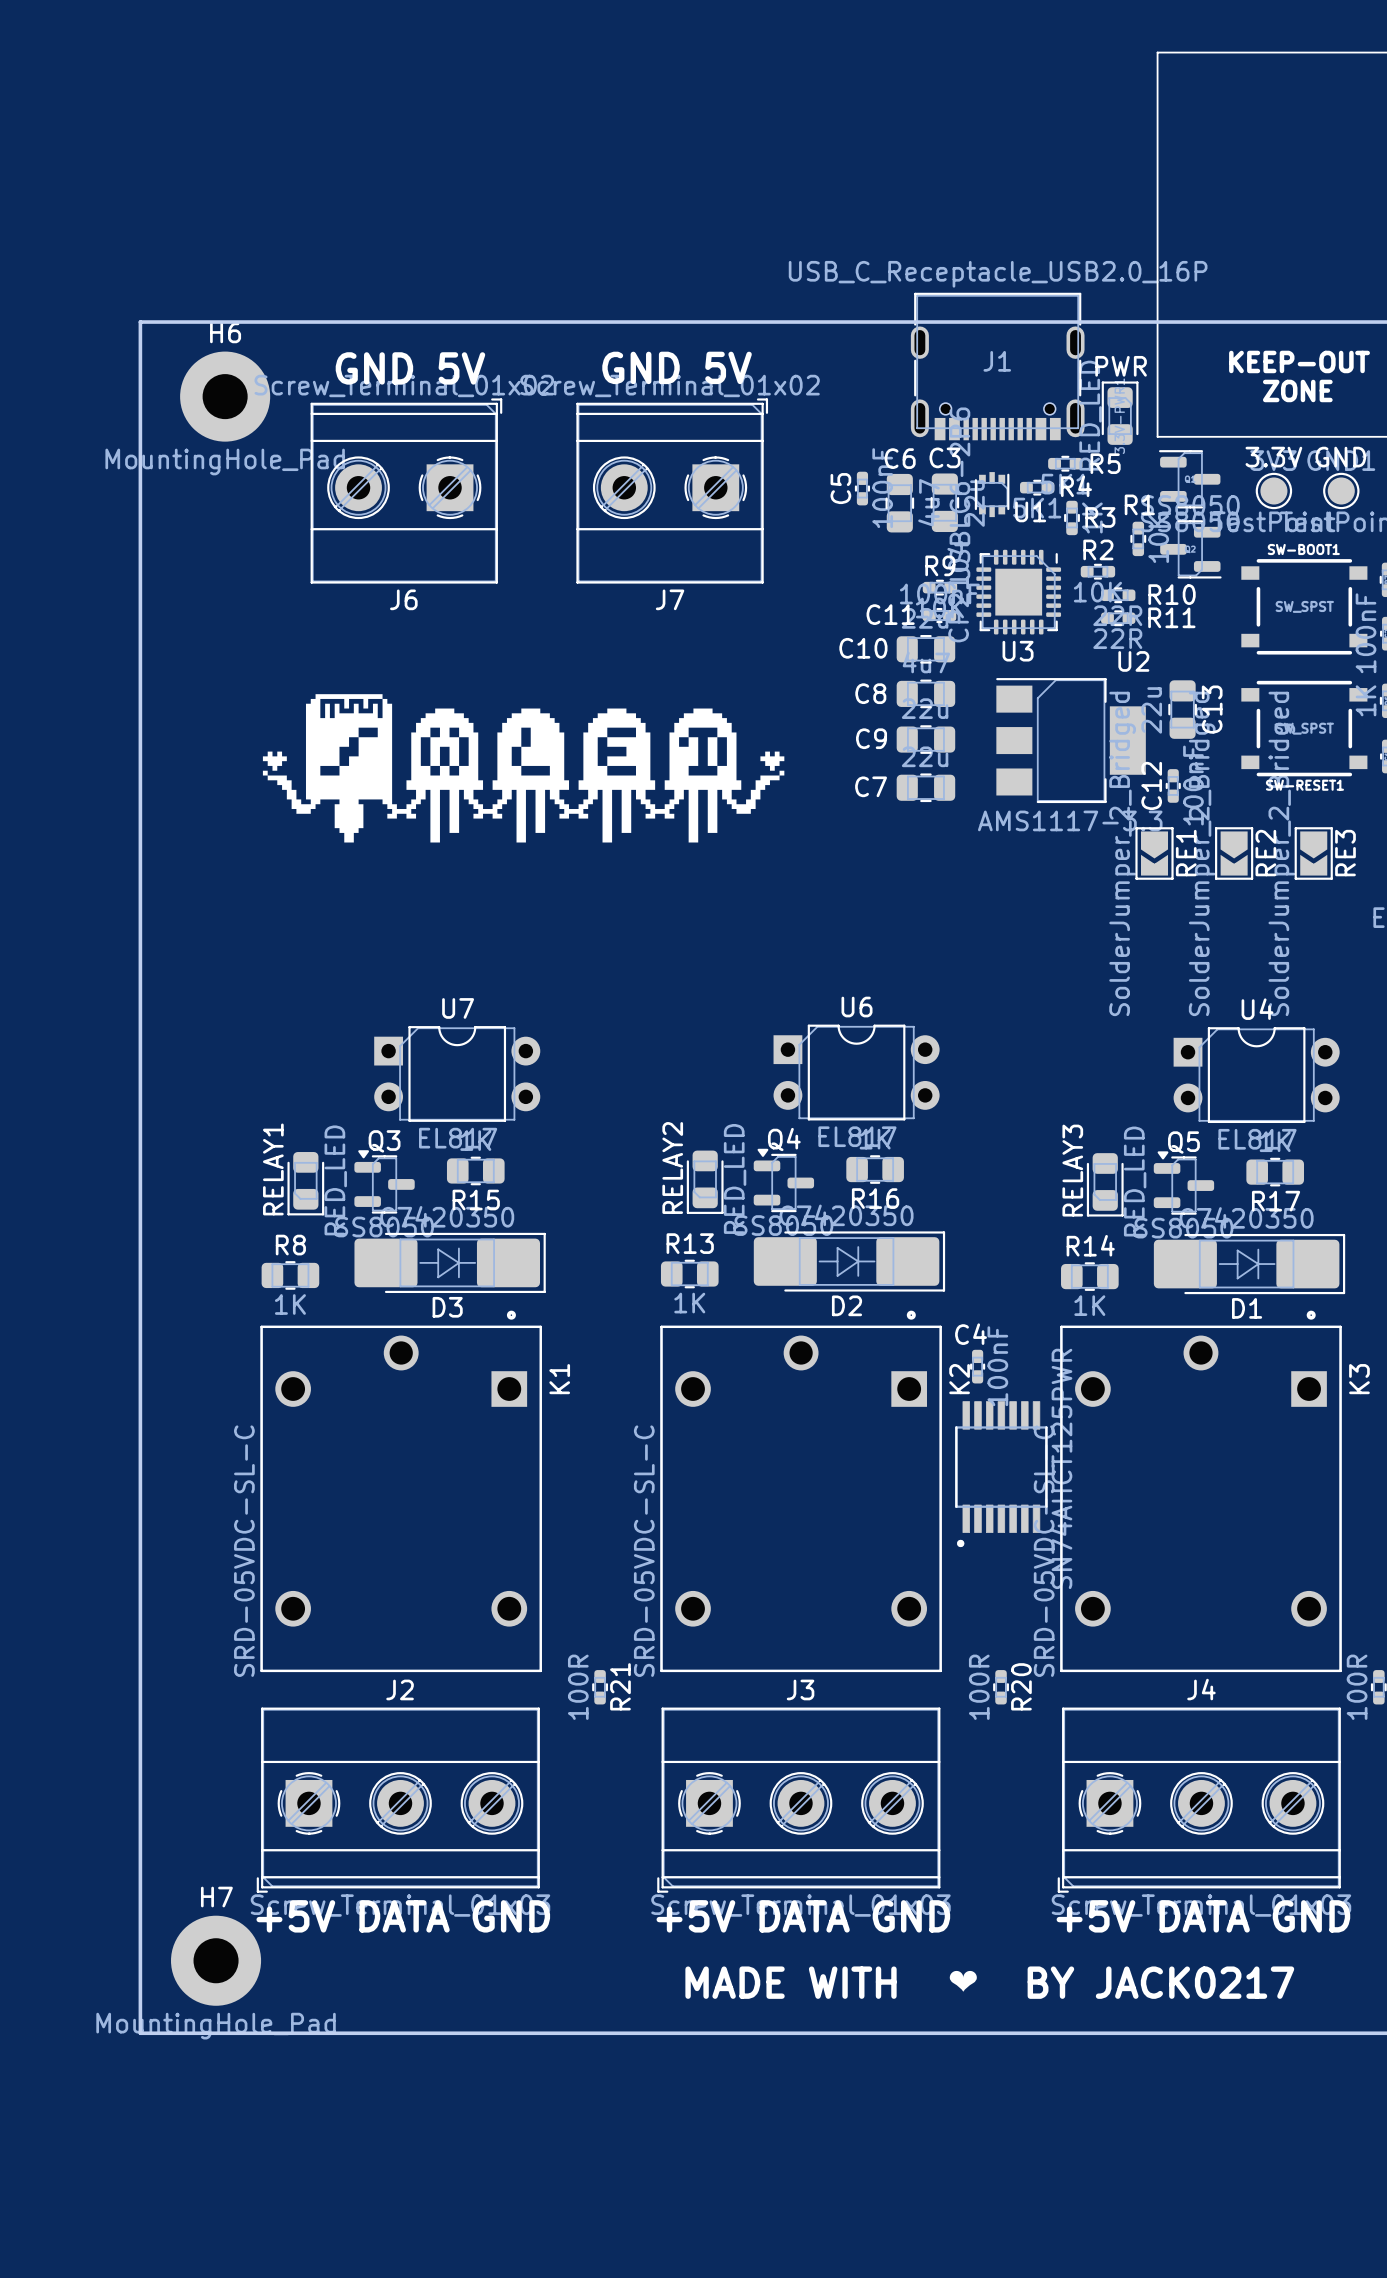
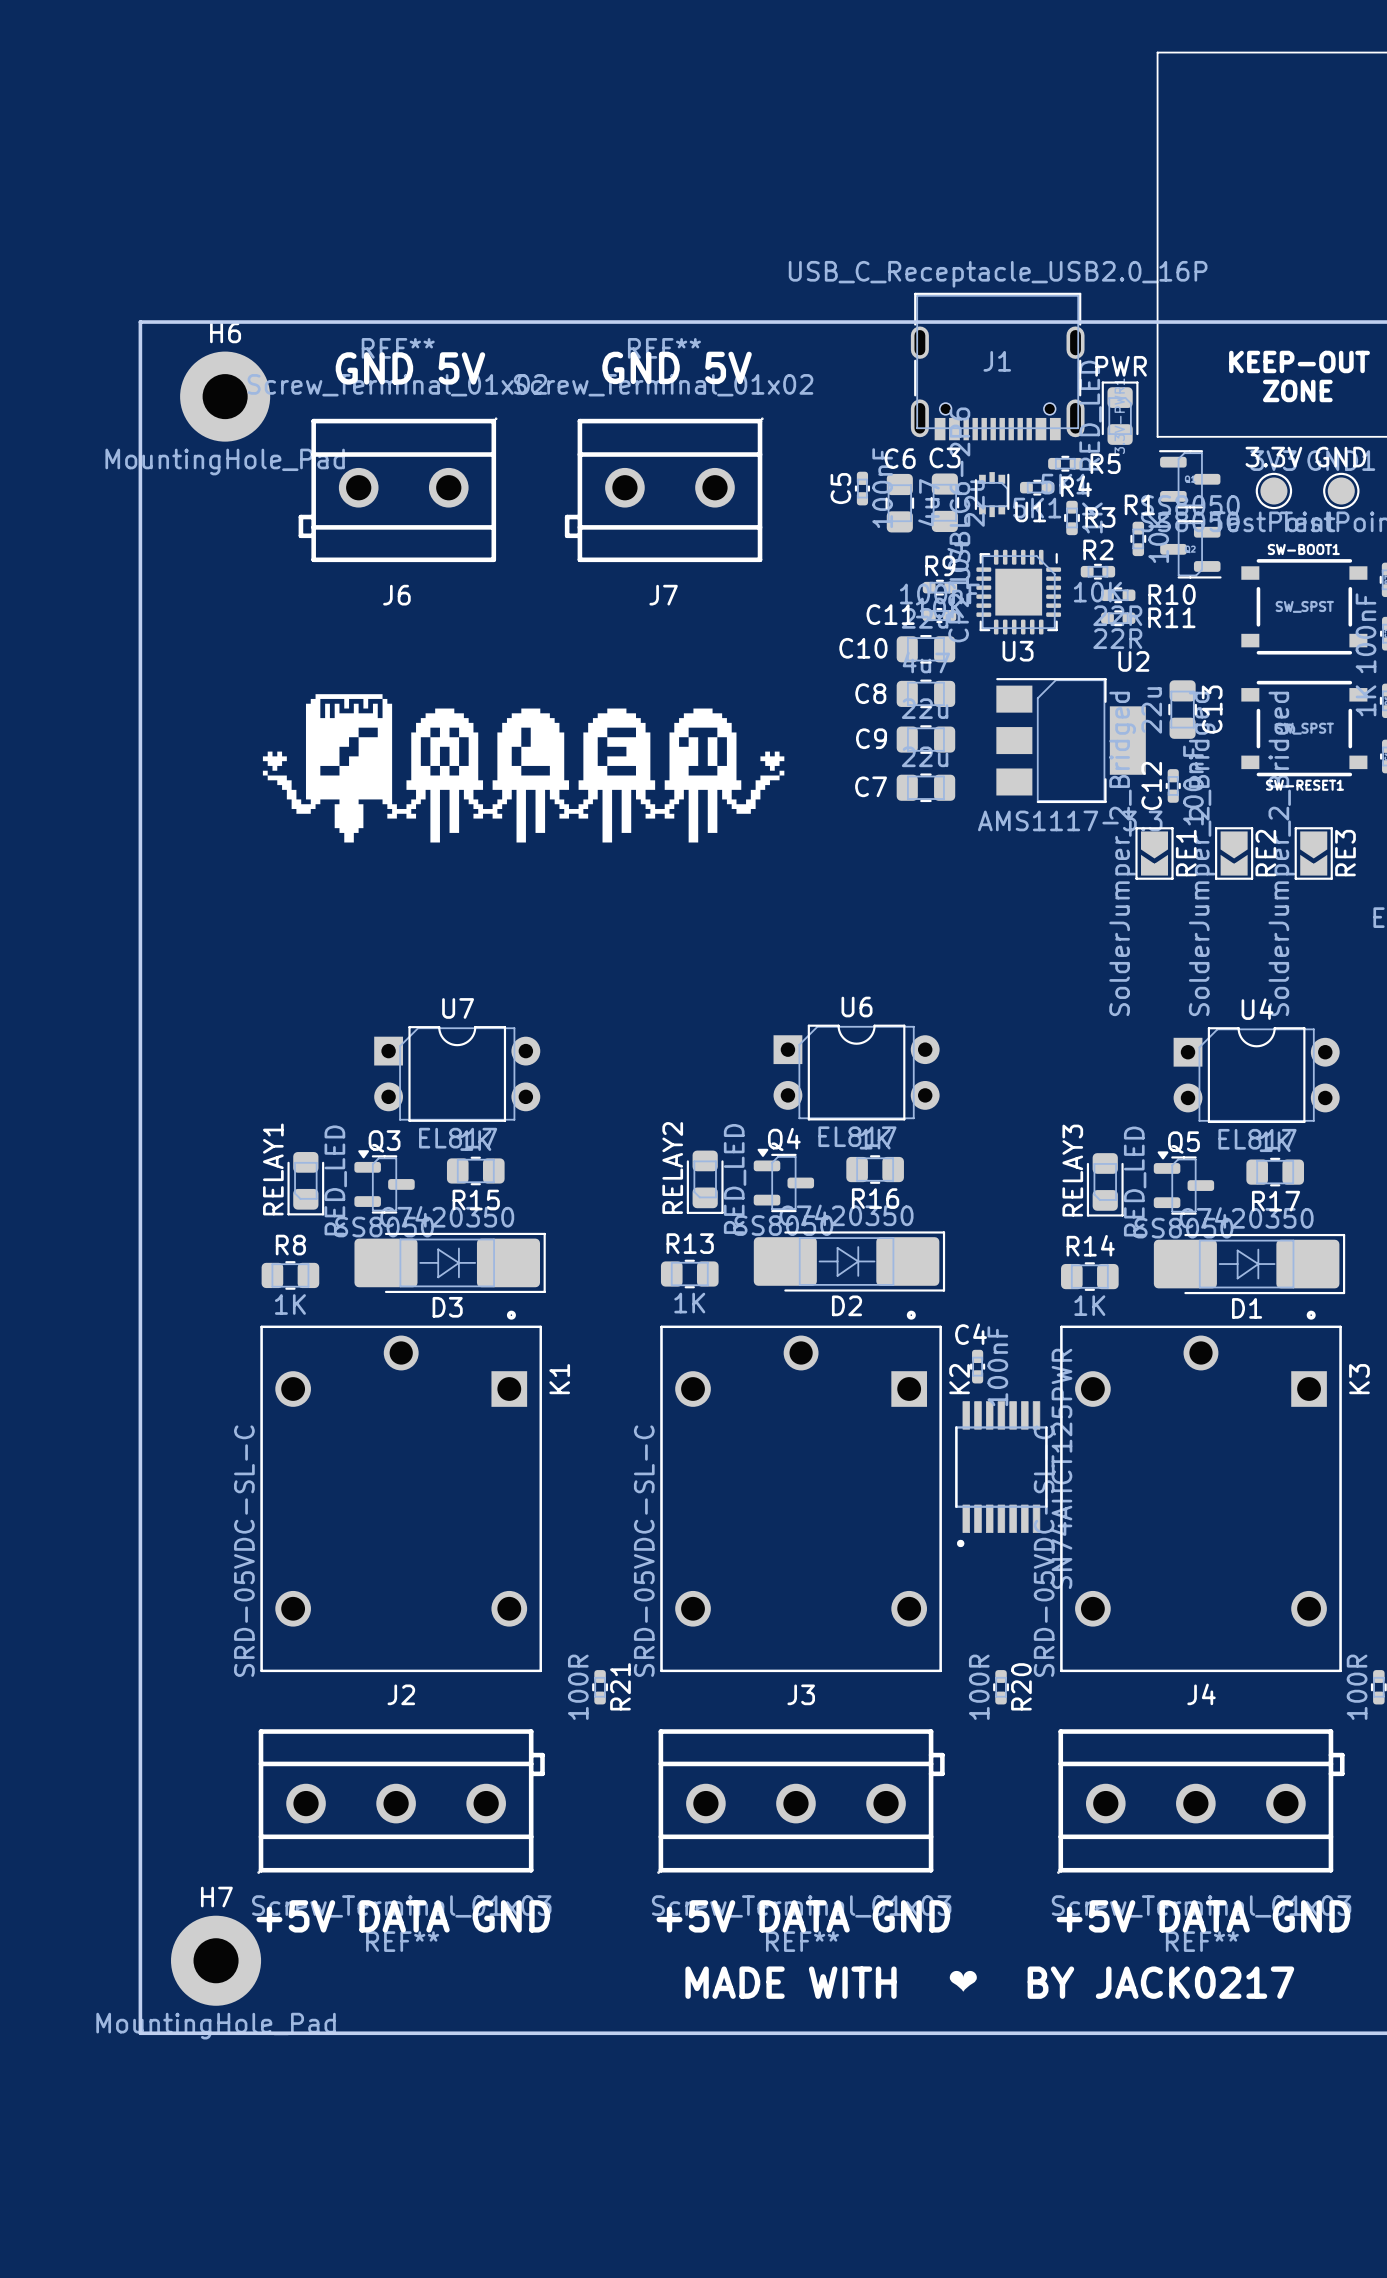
J6 footprint: [310, 398, 503, 584] -> [298, 417, 498, 563]
J7 footprint: [576, 398, 769, 584] -> [564, 417, 764, 563]
J2 footprint: [256, 1707, 540, 1893] -> [257, 1729, 545, 1874]
J3 footprint: [657, 1707, 941, 1893] -> [657, 1729, 945, 1874]
J4 footprint: [1057, 1707, 1341, 1893] -> [1057, 1729, 1345, 1874]

